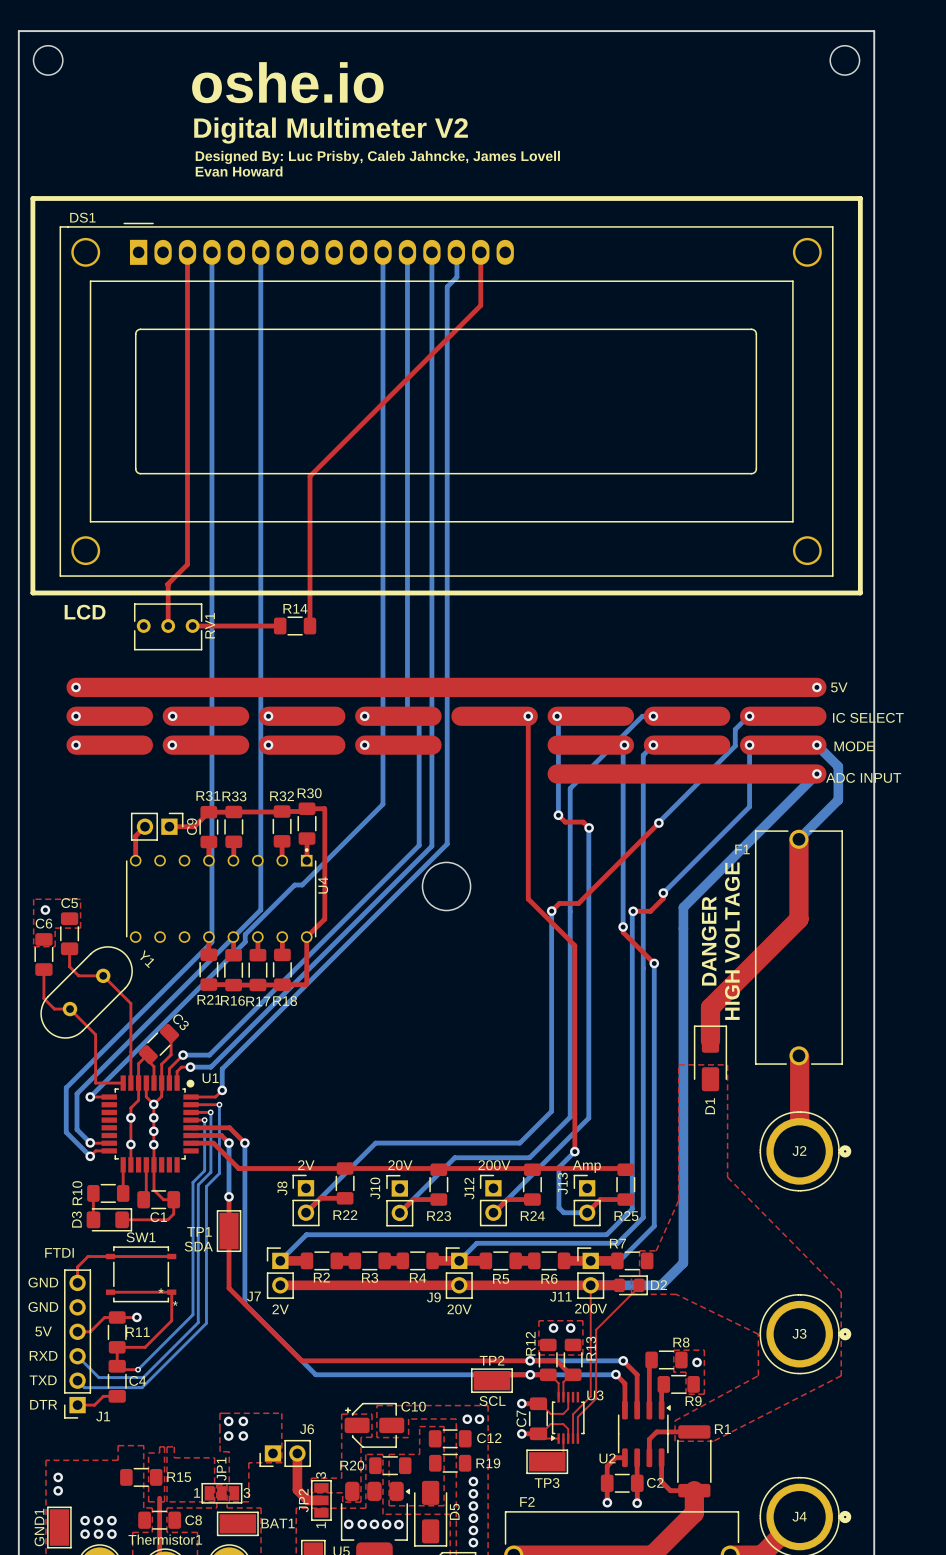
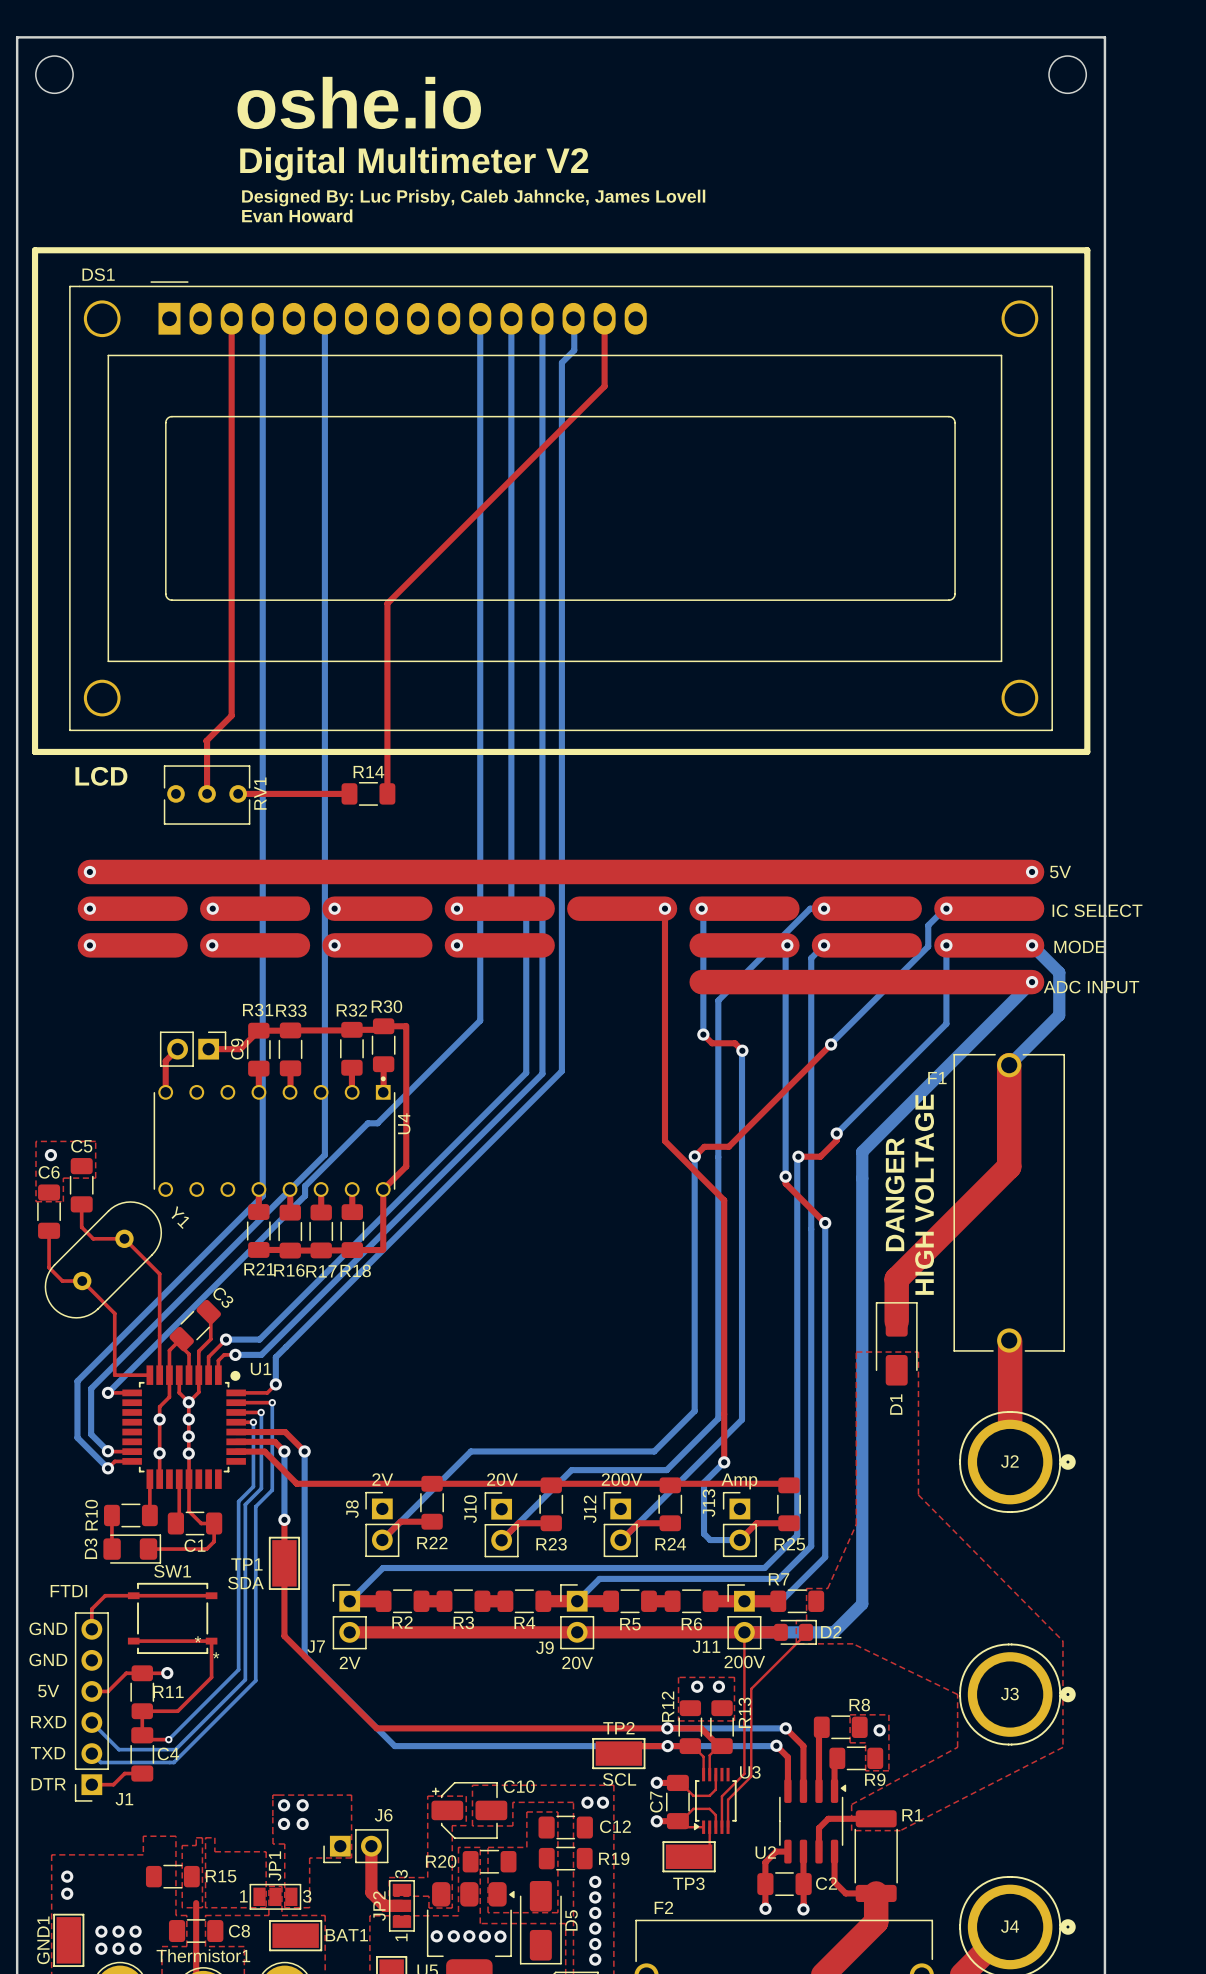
round board edge: [422, 862, 471, 911] -> none

